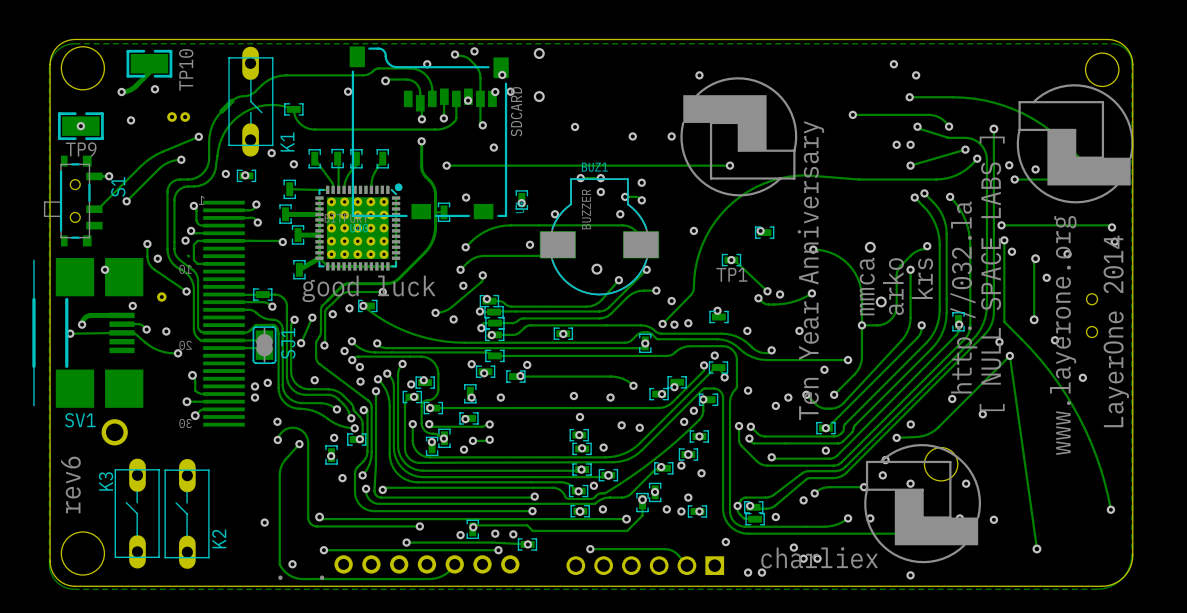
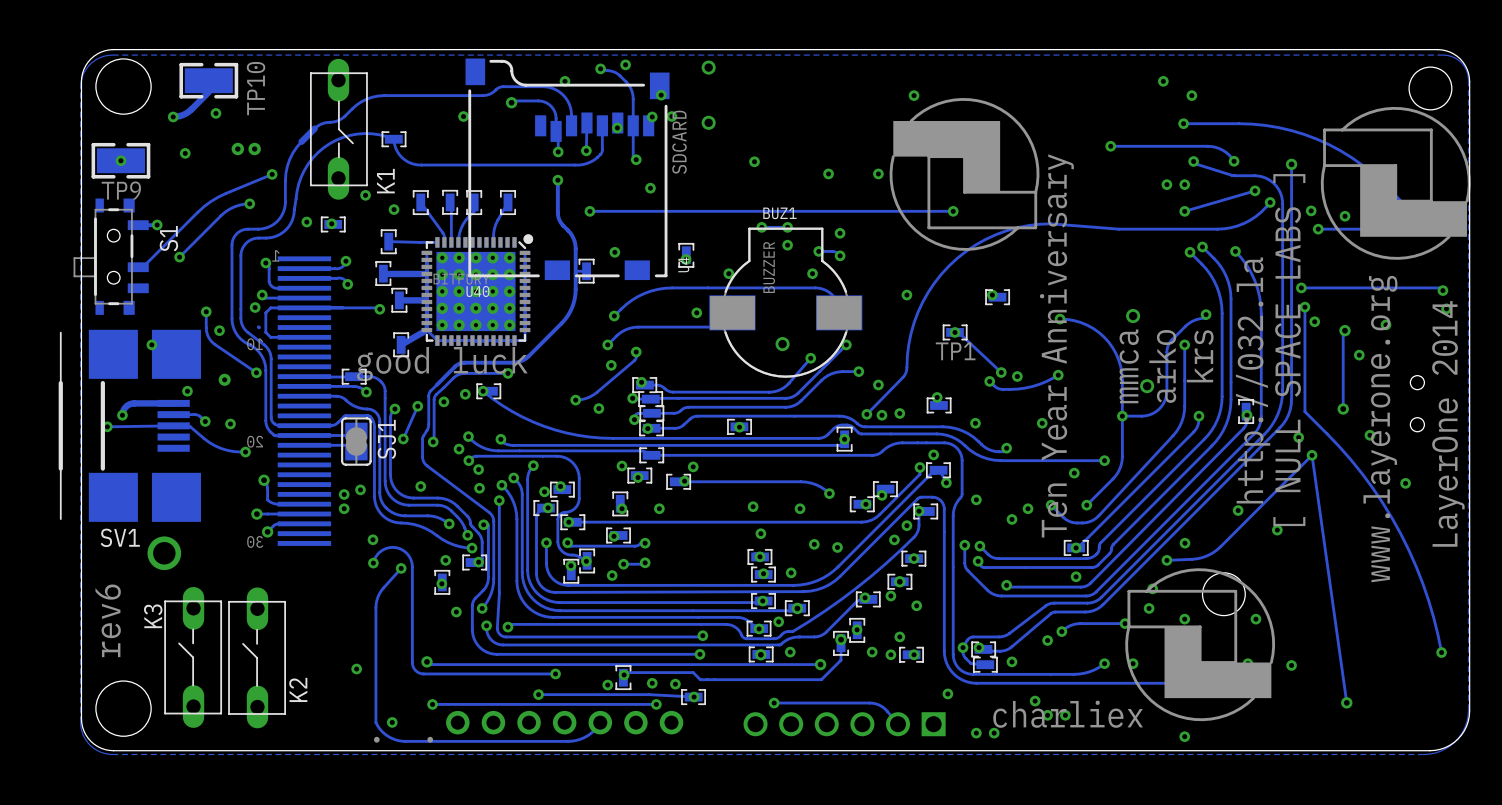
text position: good luck (369, 288) -> good luck (442, 363)

